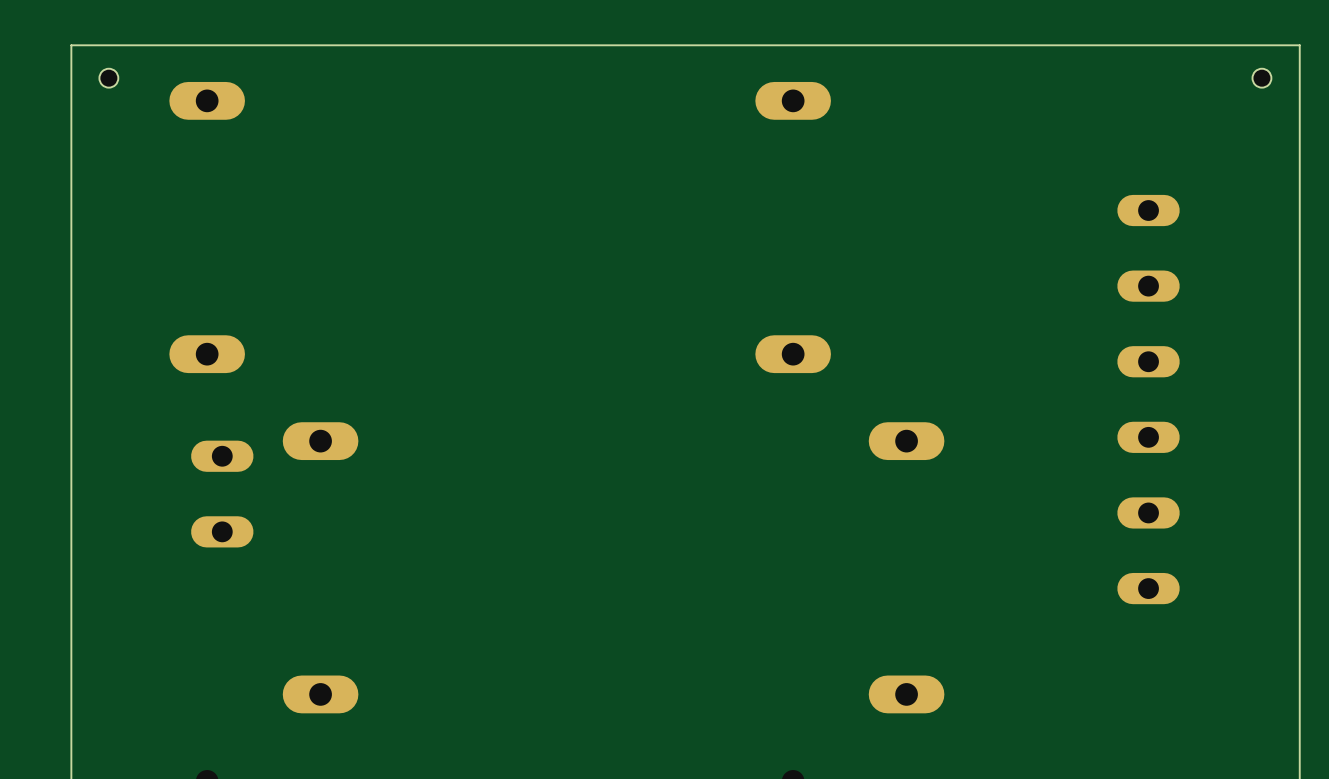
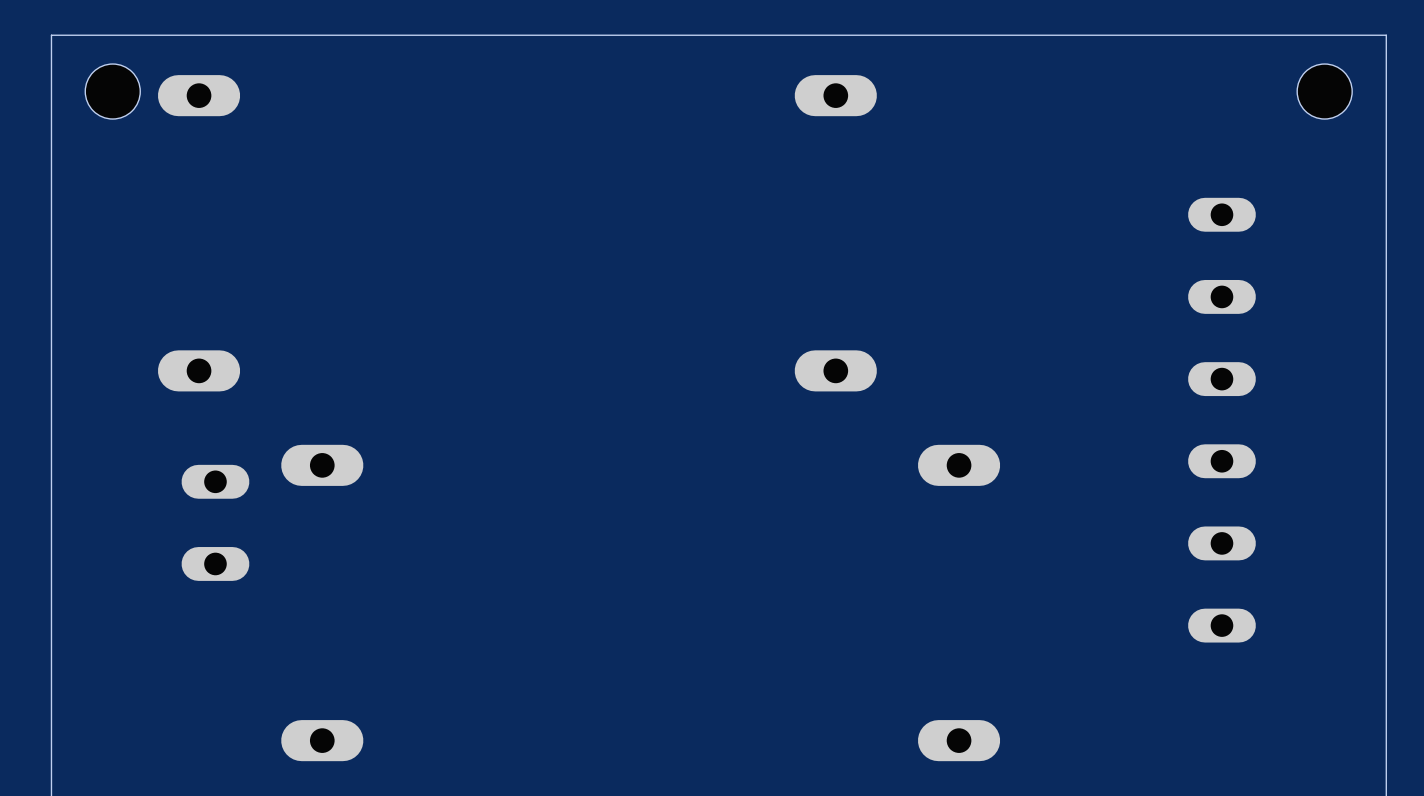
hole: (108, 78) -> none
hole: (1261, 78) -> none
hole: none -> (112, 91)
hole: none -> (1324, 91)

